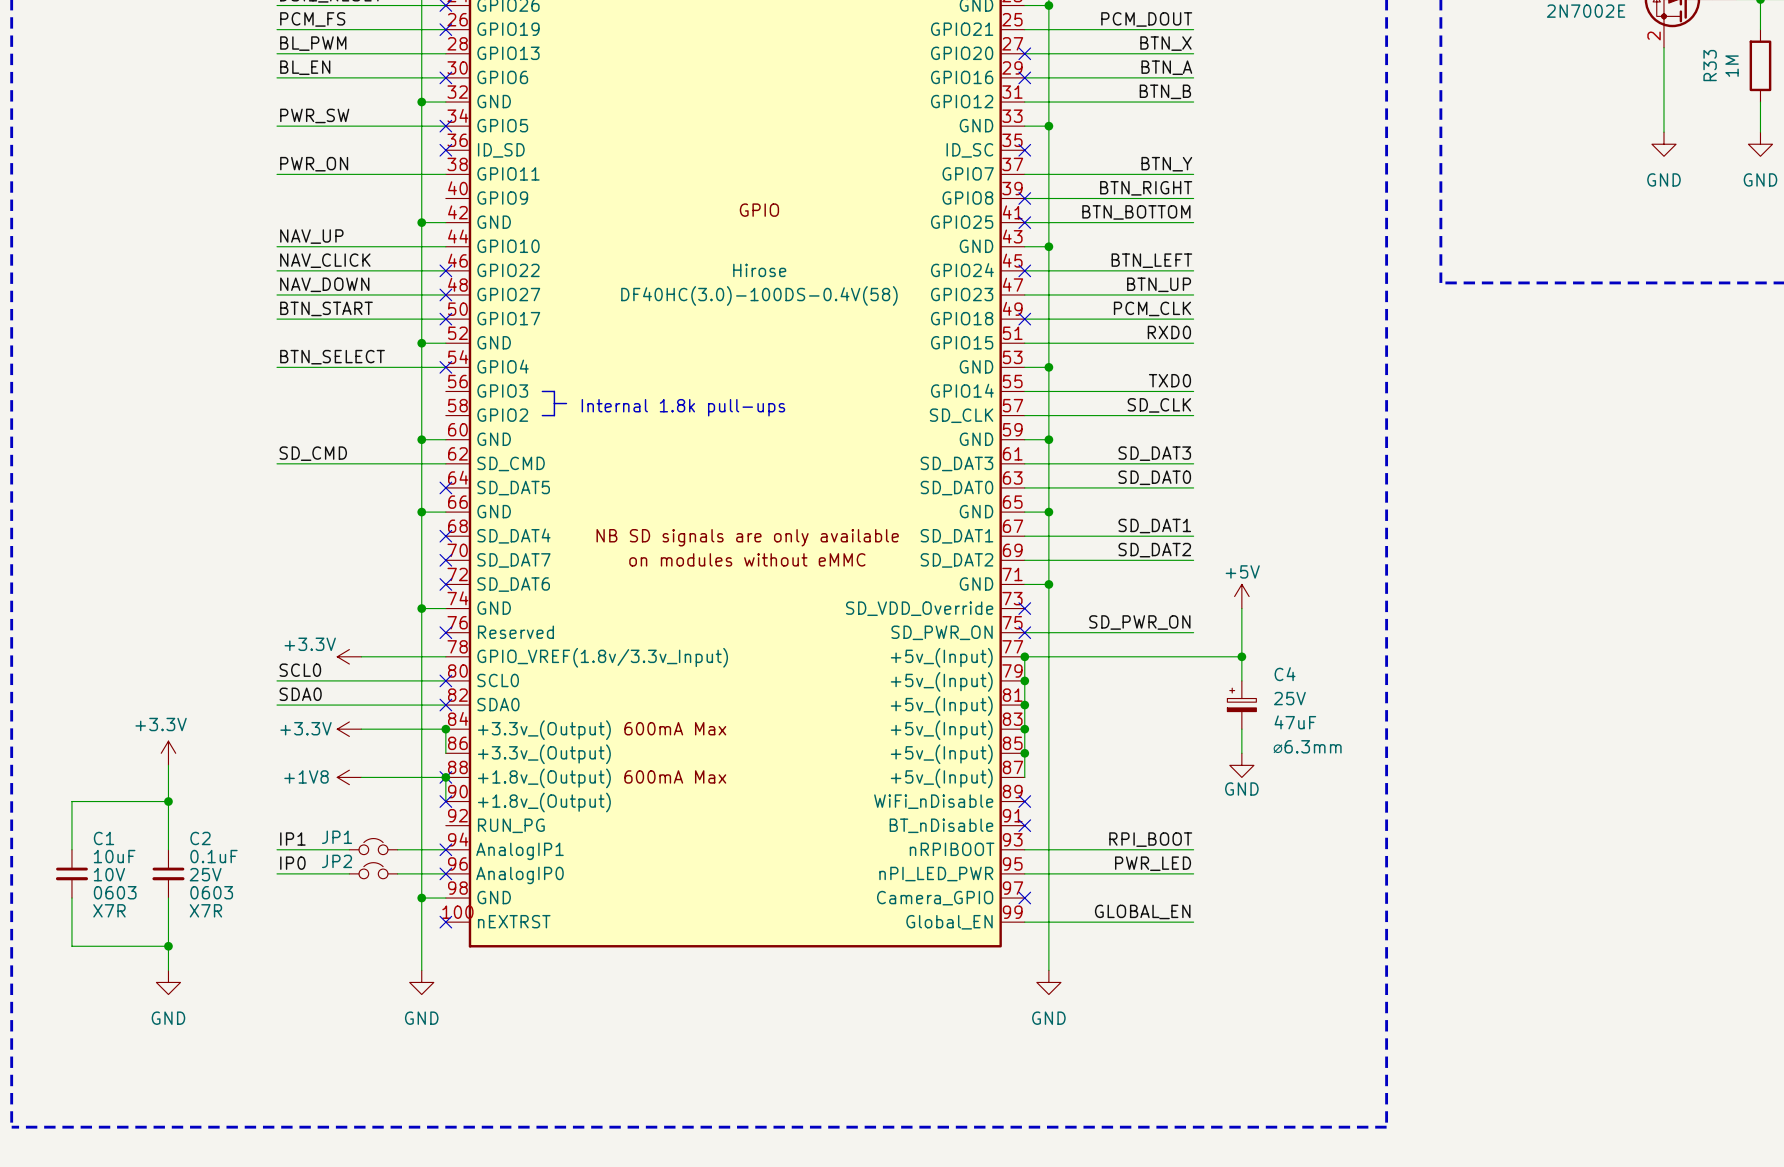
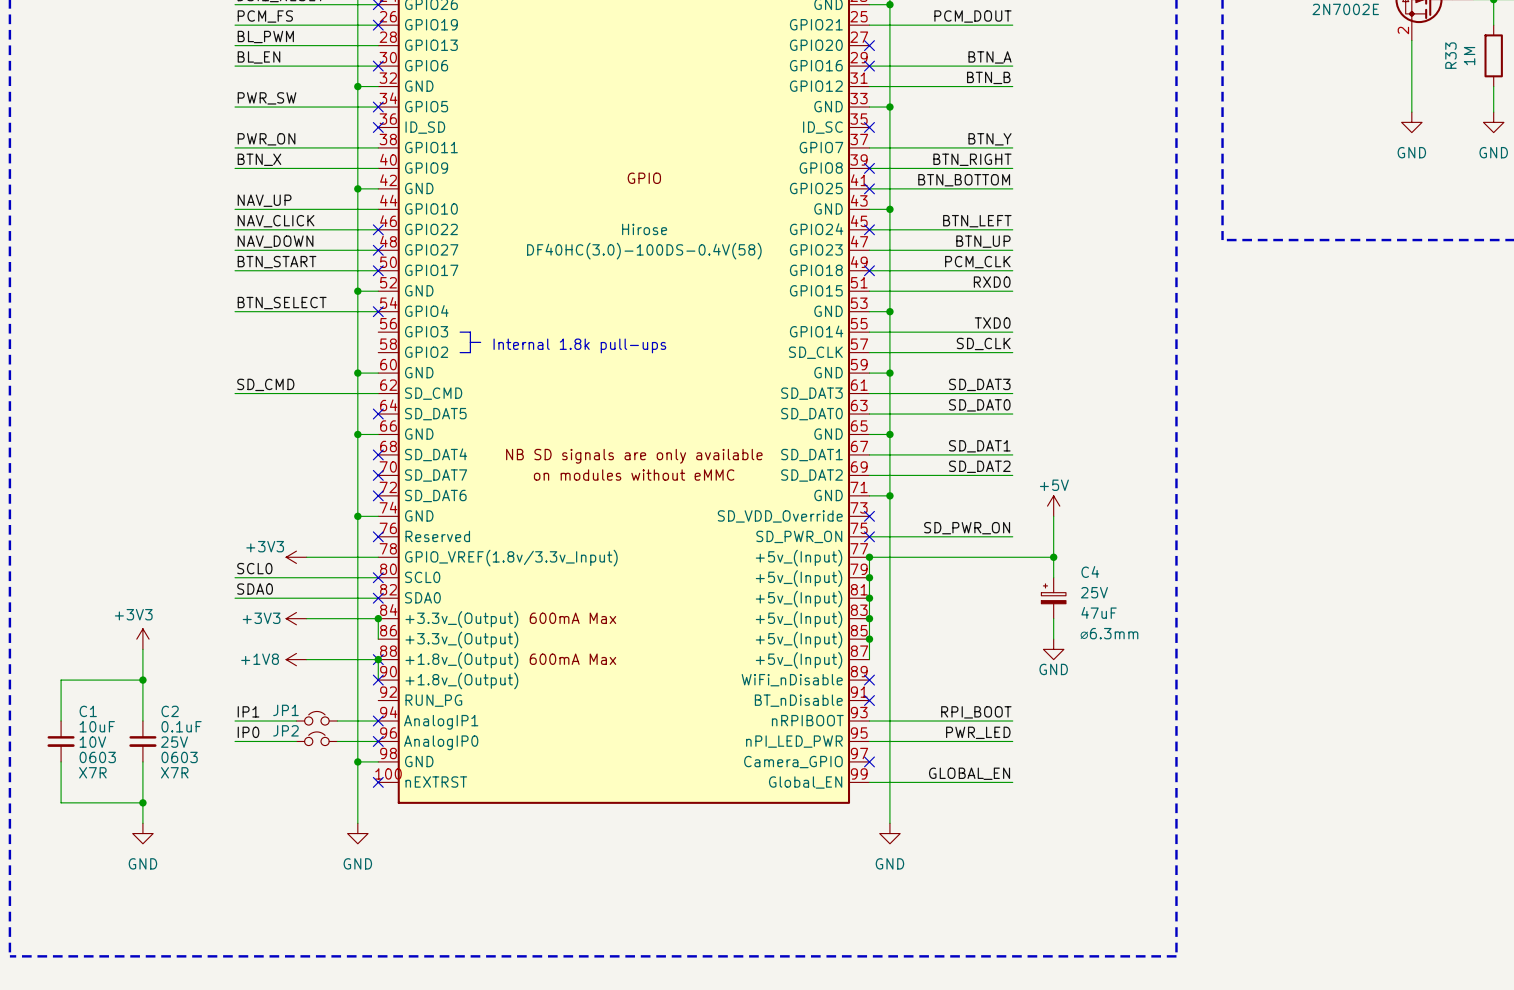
label: BTN_X (1165, 43) -> none
wire: (1024, 53) (1193, 53) -> none
label: none -> BTN_X (259, 159)
wire: none -> (235, 168) (378, 168)
power symbol: +3.3V (349, 656) -> +3V3 (296, 557)
power symbol: +3.3V (349, 729) -> +3V3 (296, 618)
power symbol: +3.3V (168, 753) -> +3V3 (142, 639)

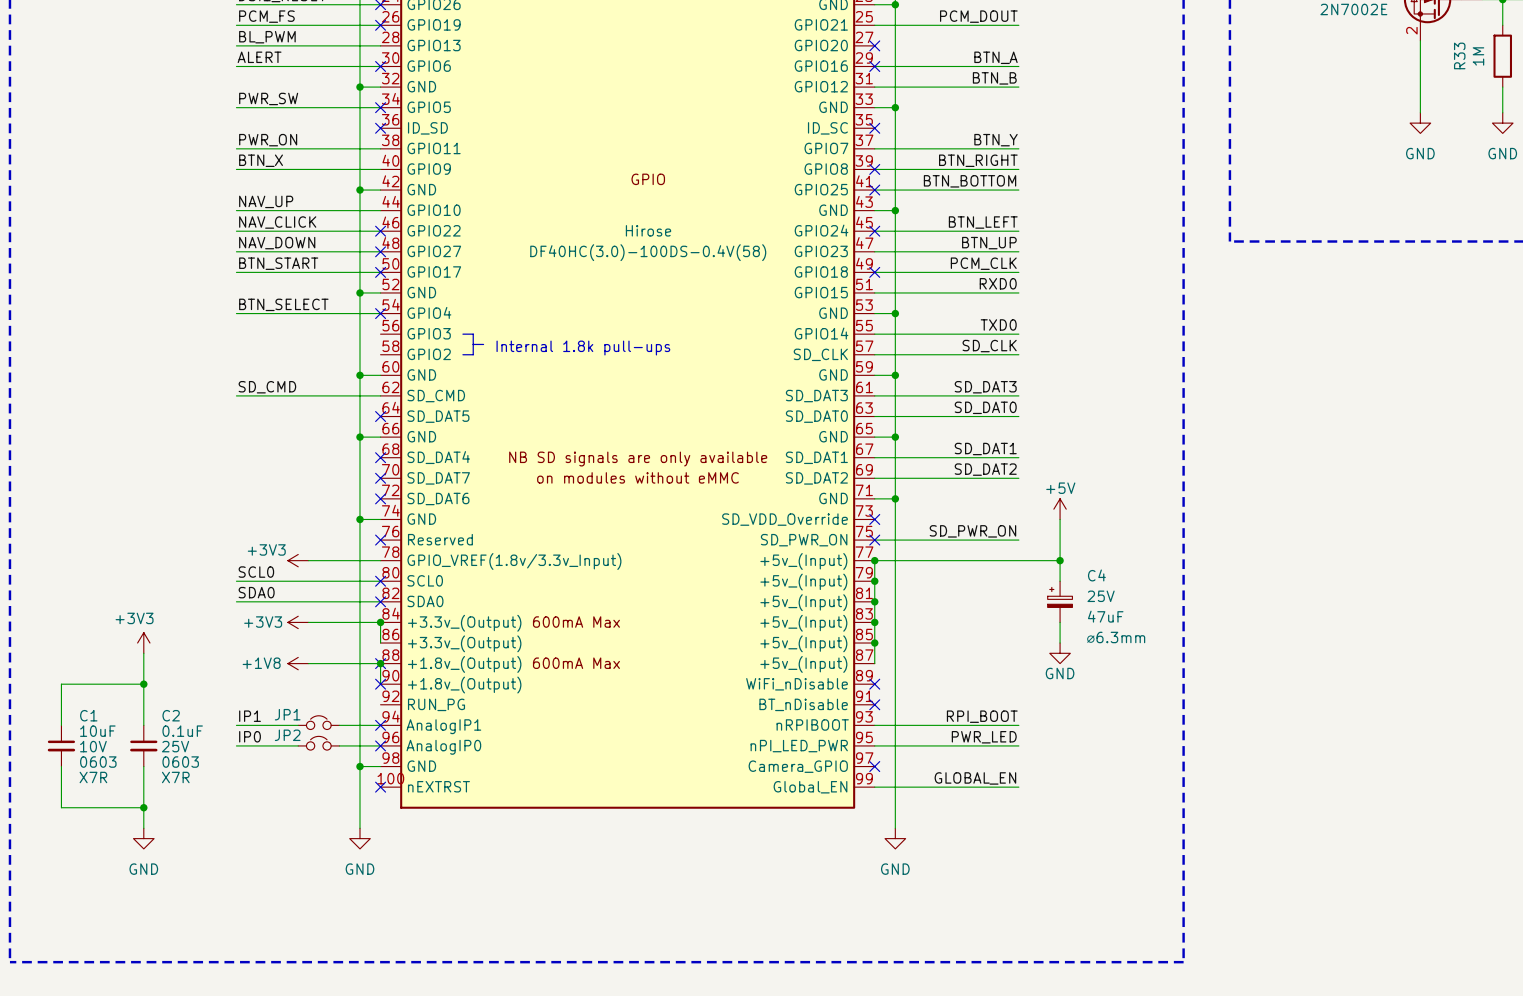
label: BL_EN (258, 57) -> ALERT (259, 57)

